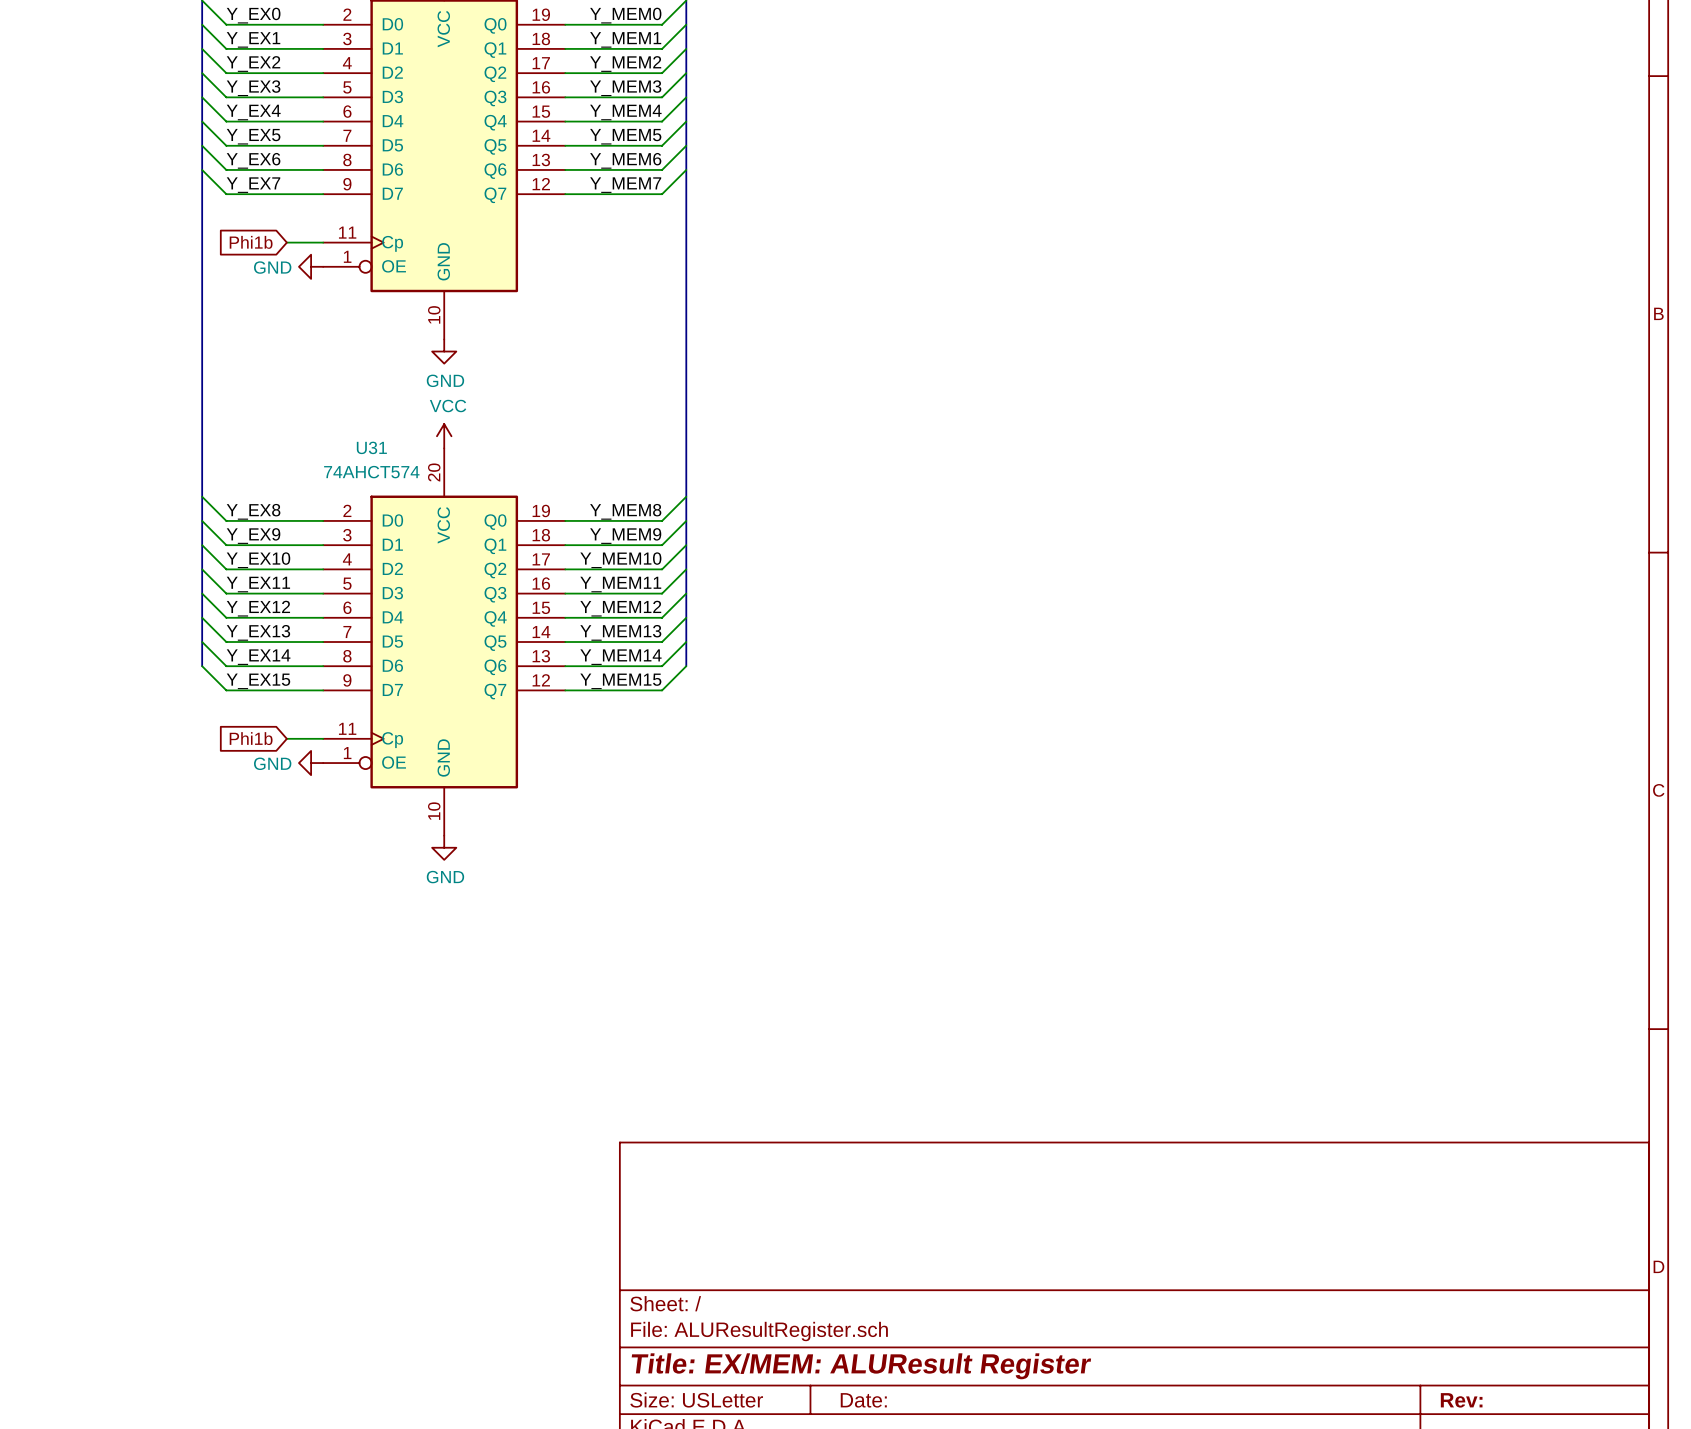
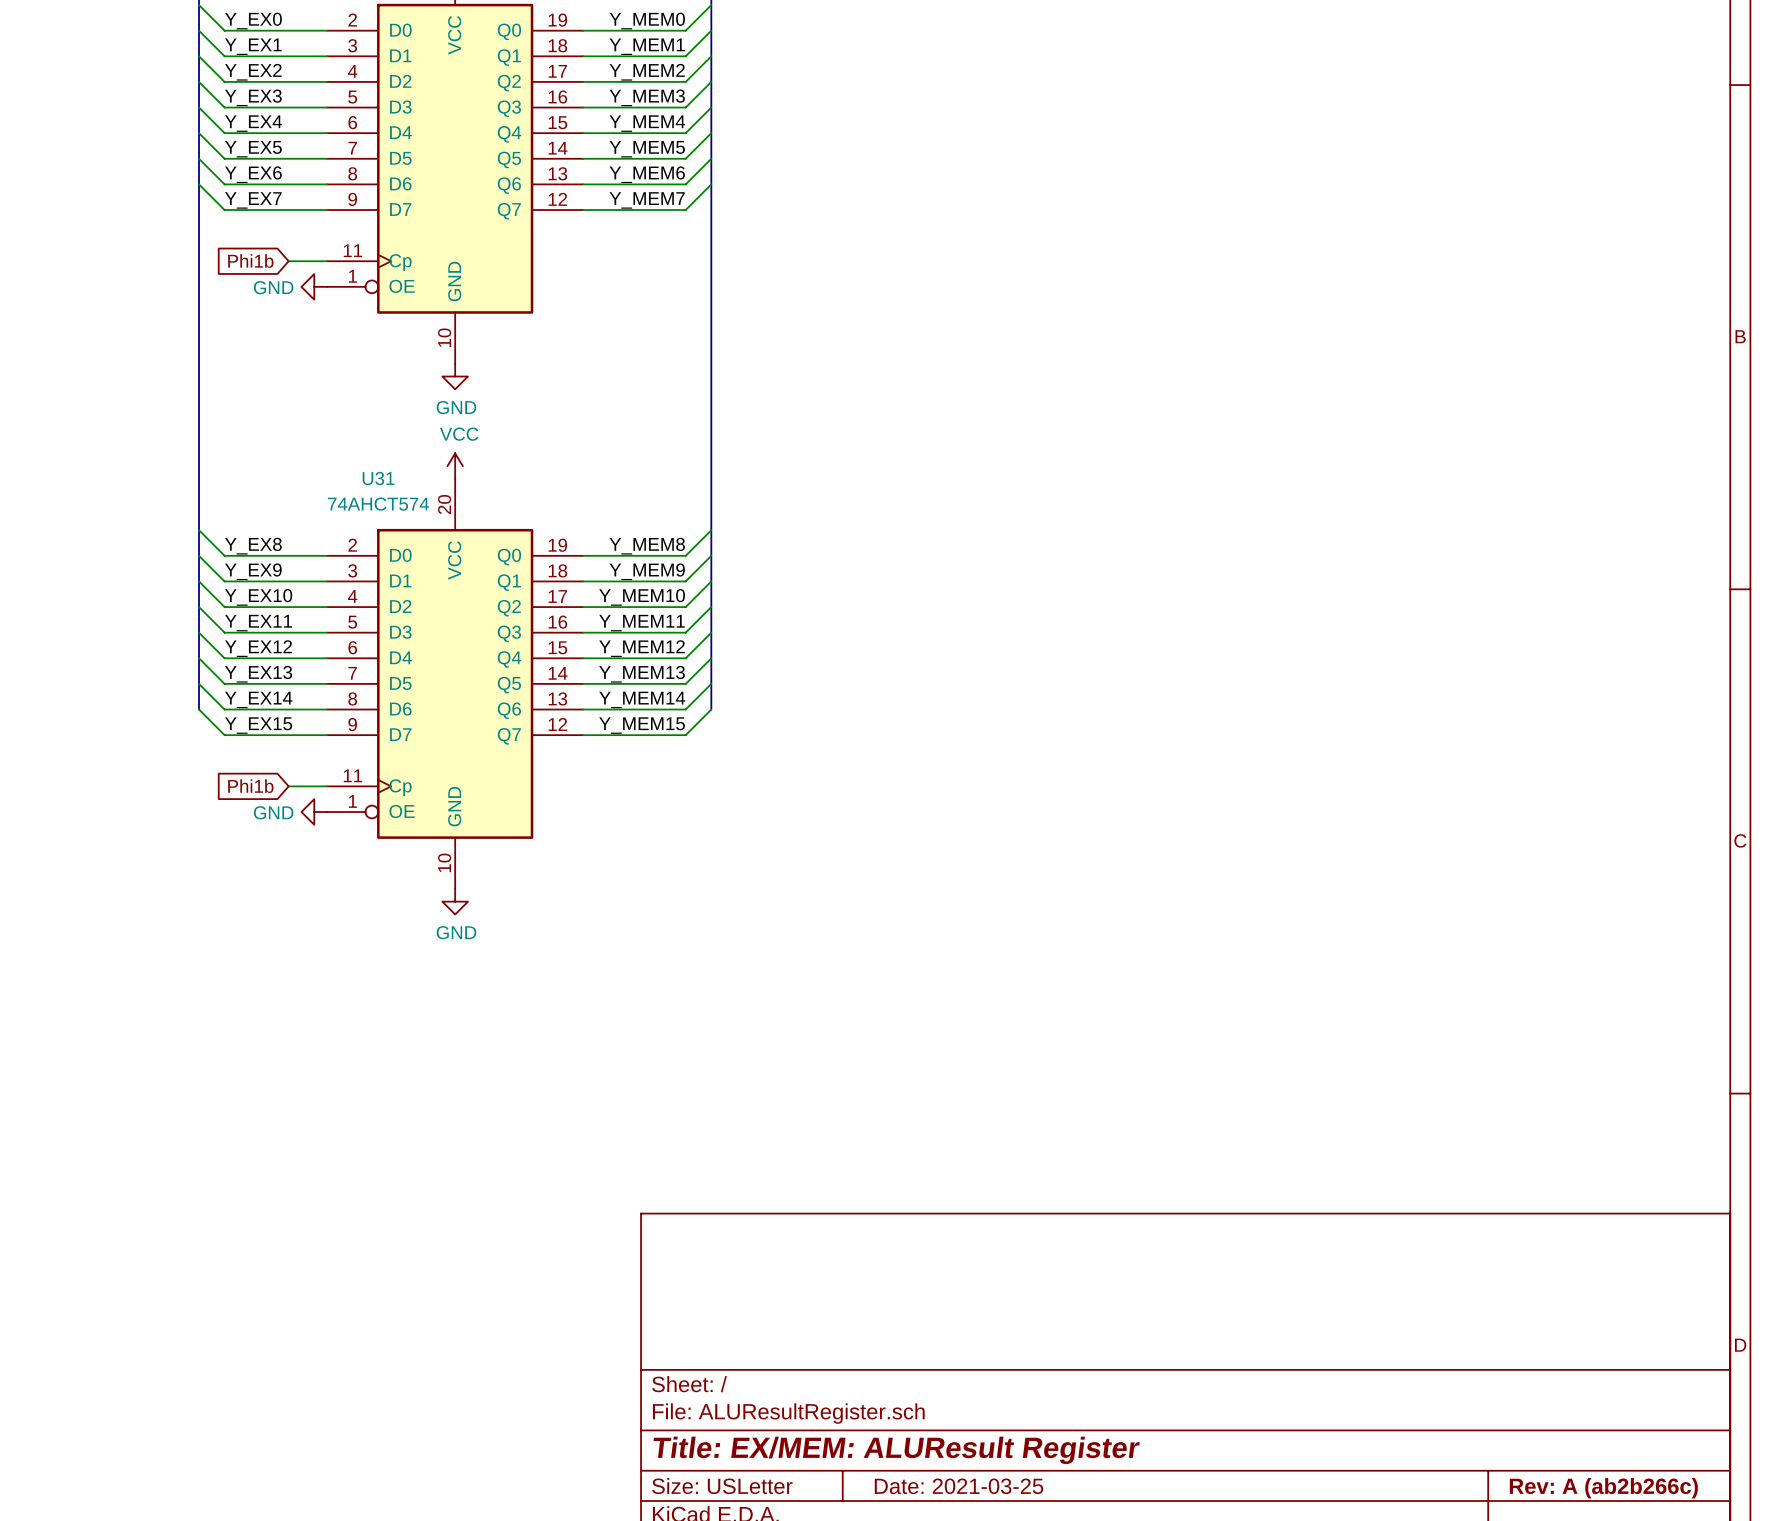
title block: Date: (863, 1400) -> Date: 2021-03-25 (959, 1486)
title block: Rev: (1461, 1400) -> Rev: A (ab2b266c) (1603, 1488)

